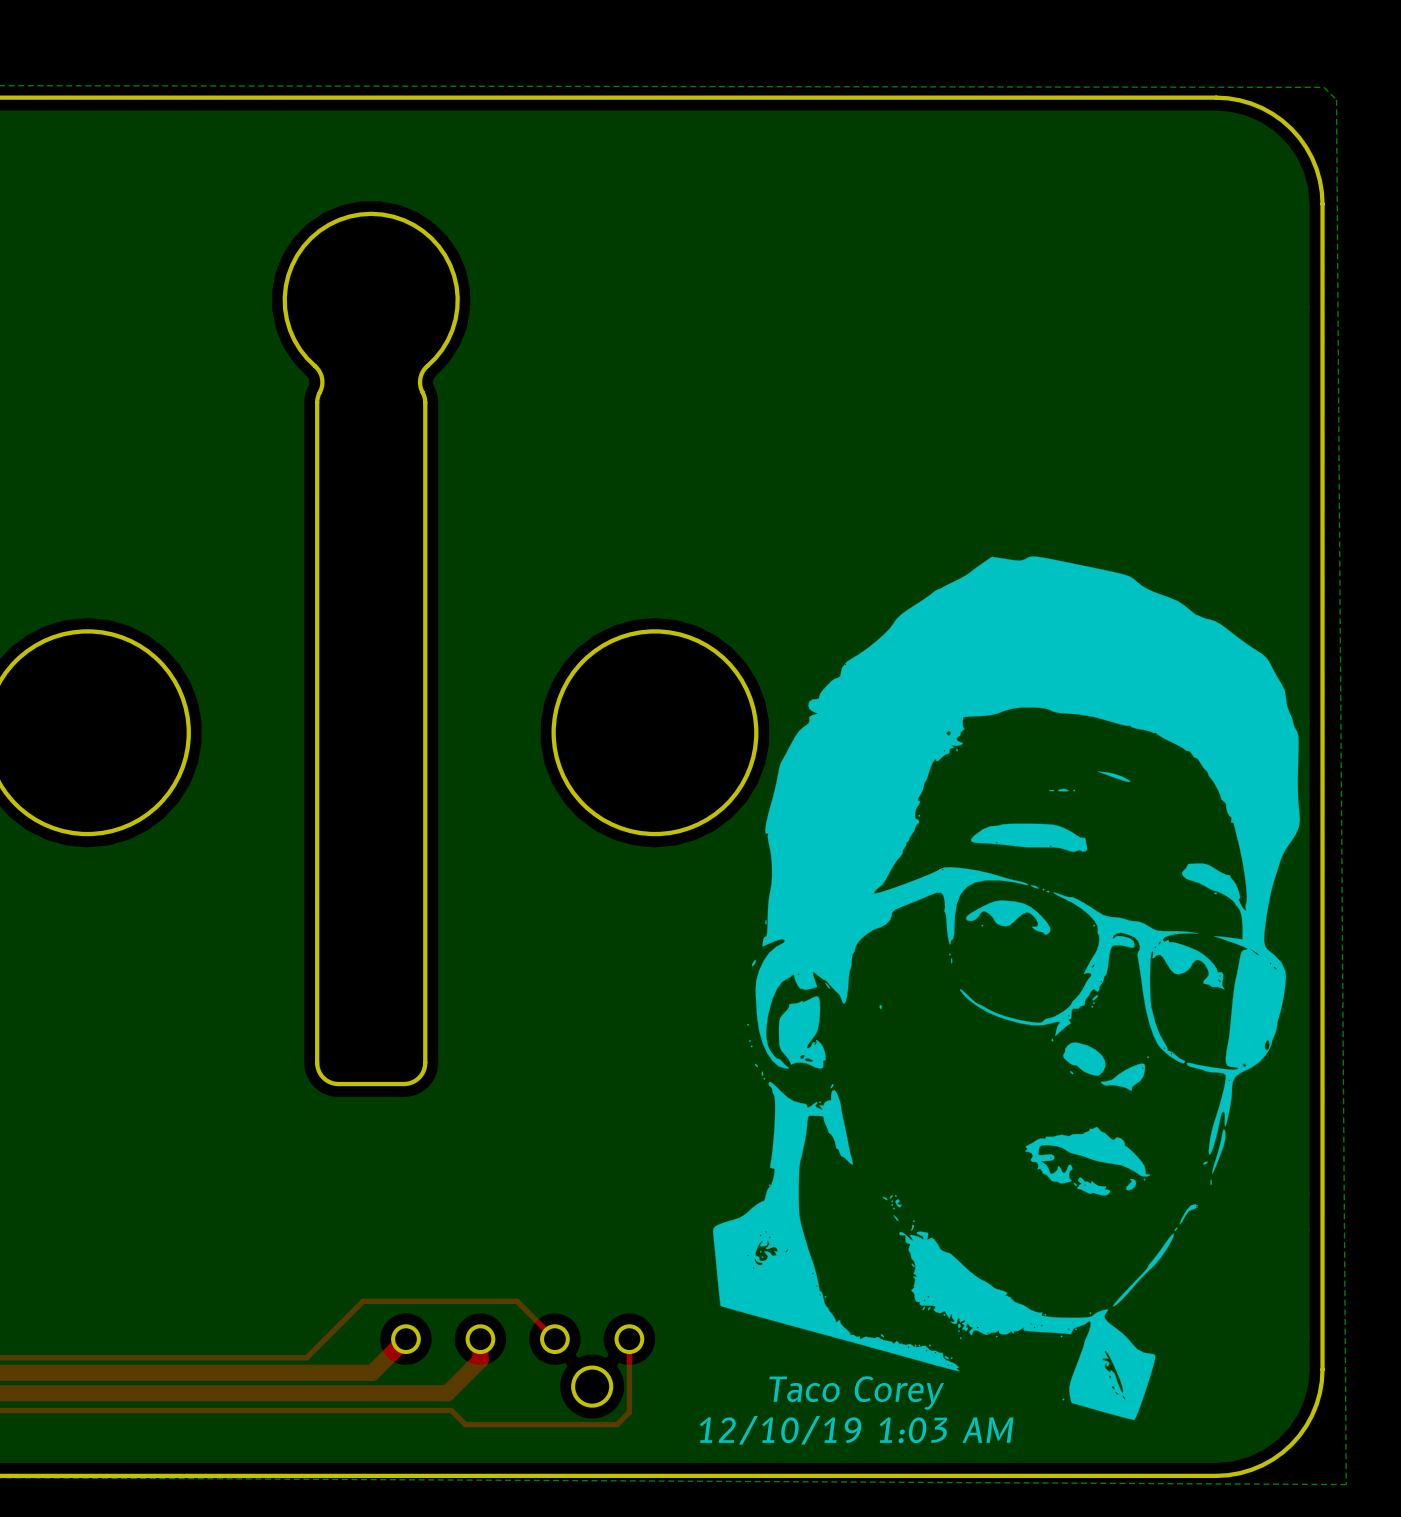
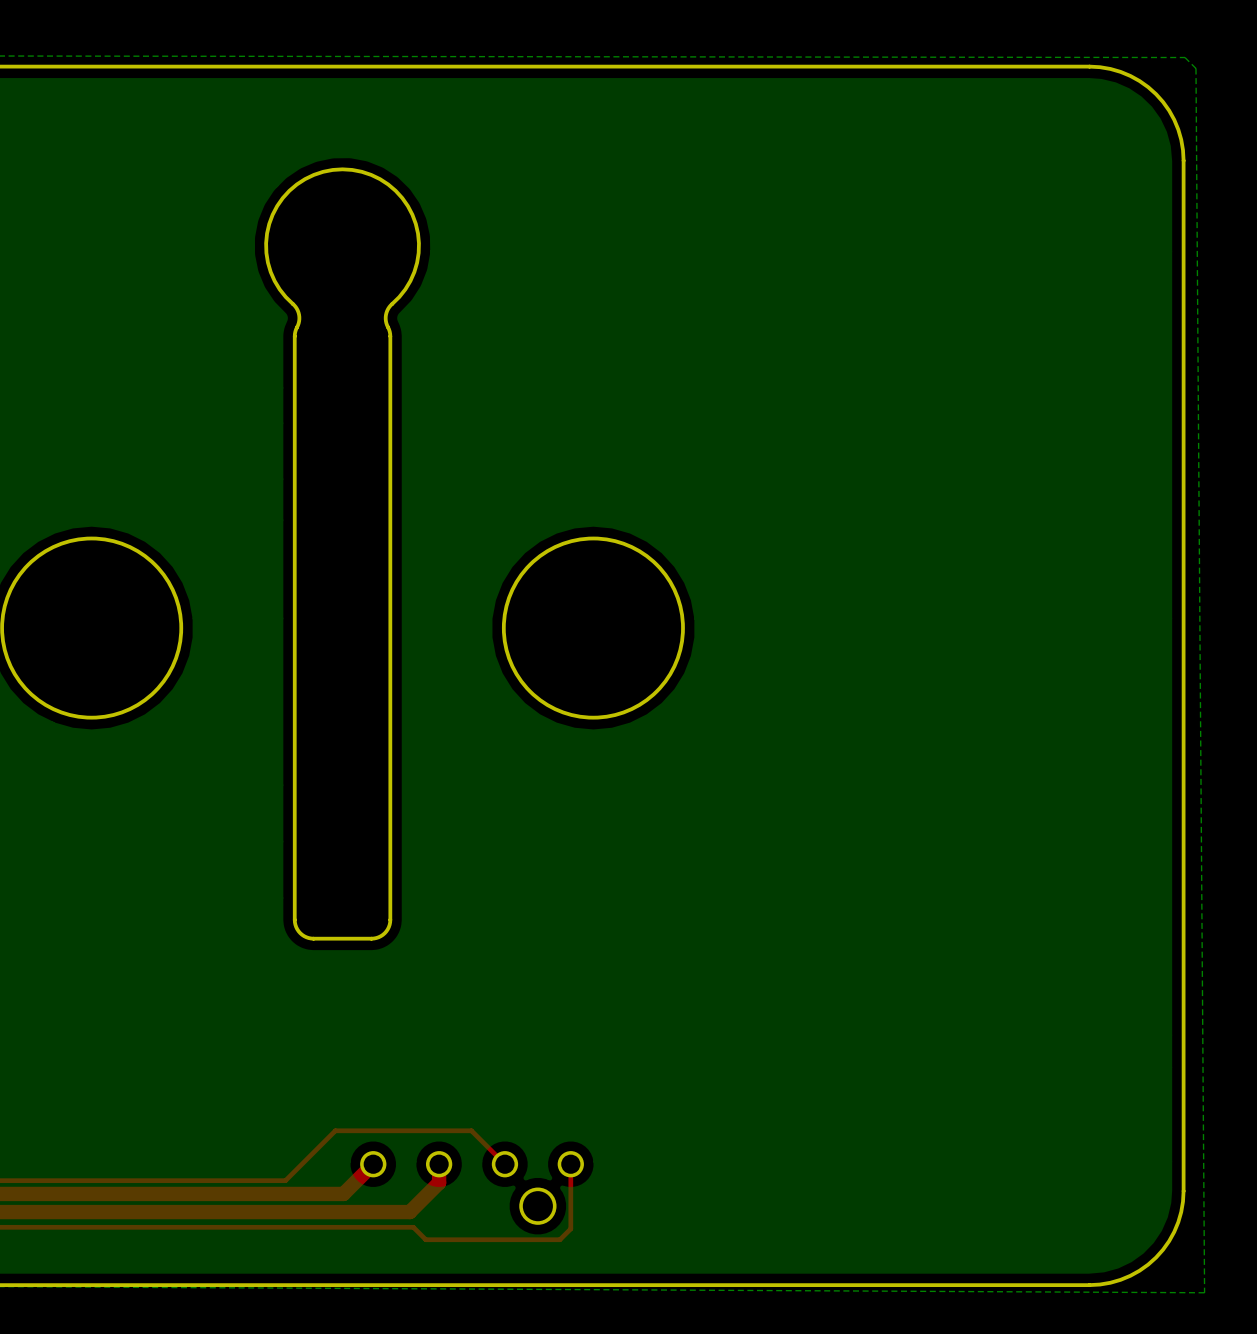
drawing: [713, 556, 1300, 1421] -> none
text: Taco Corey (856, 1393) -> none
text: 12/10/19 1:03 AM (856, 1430) -> none

